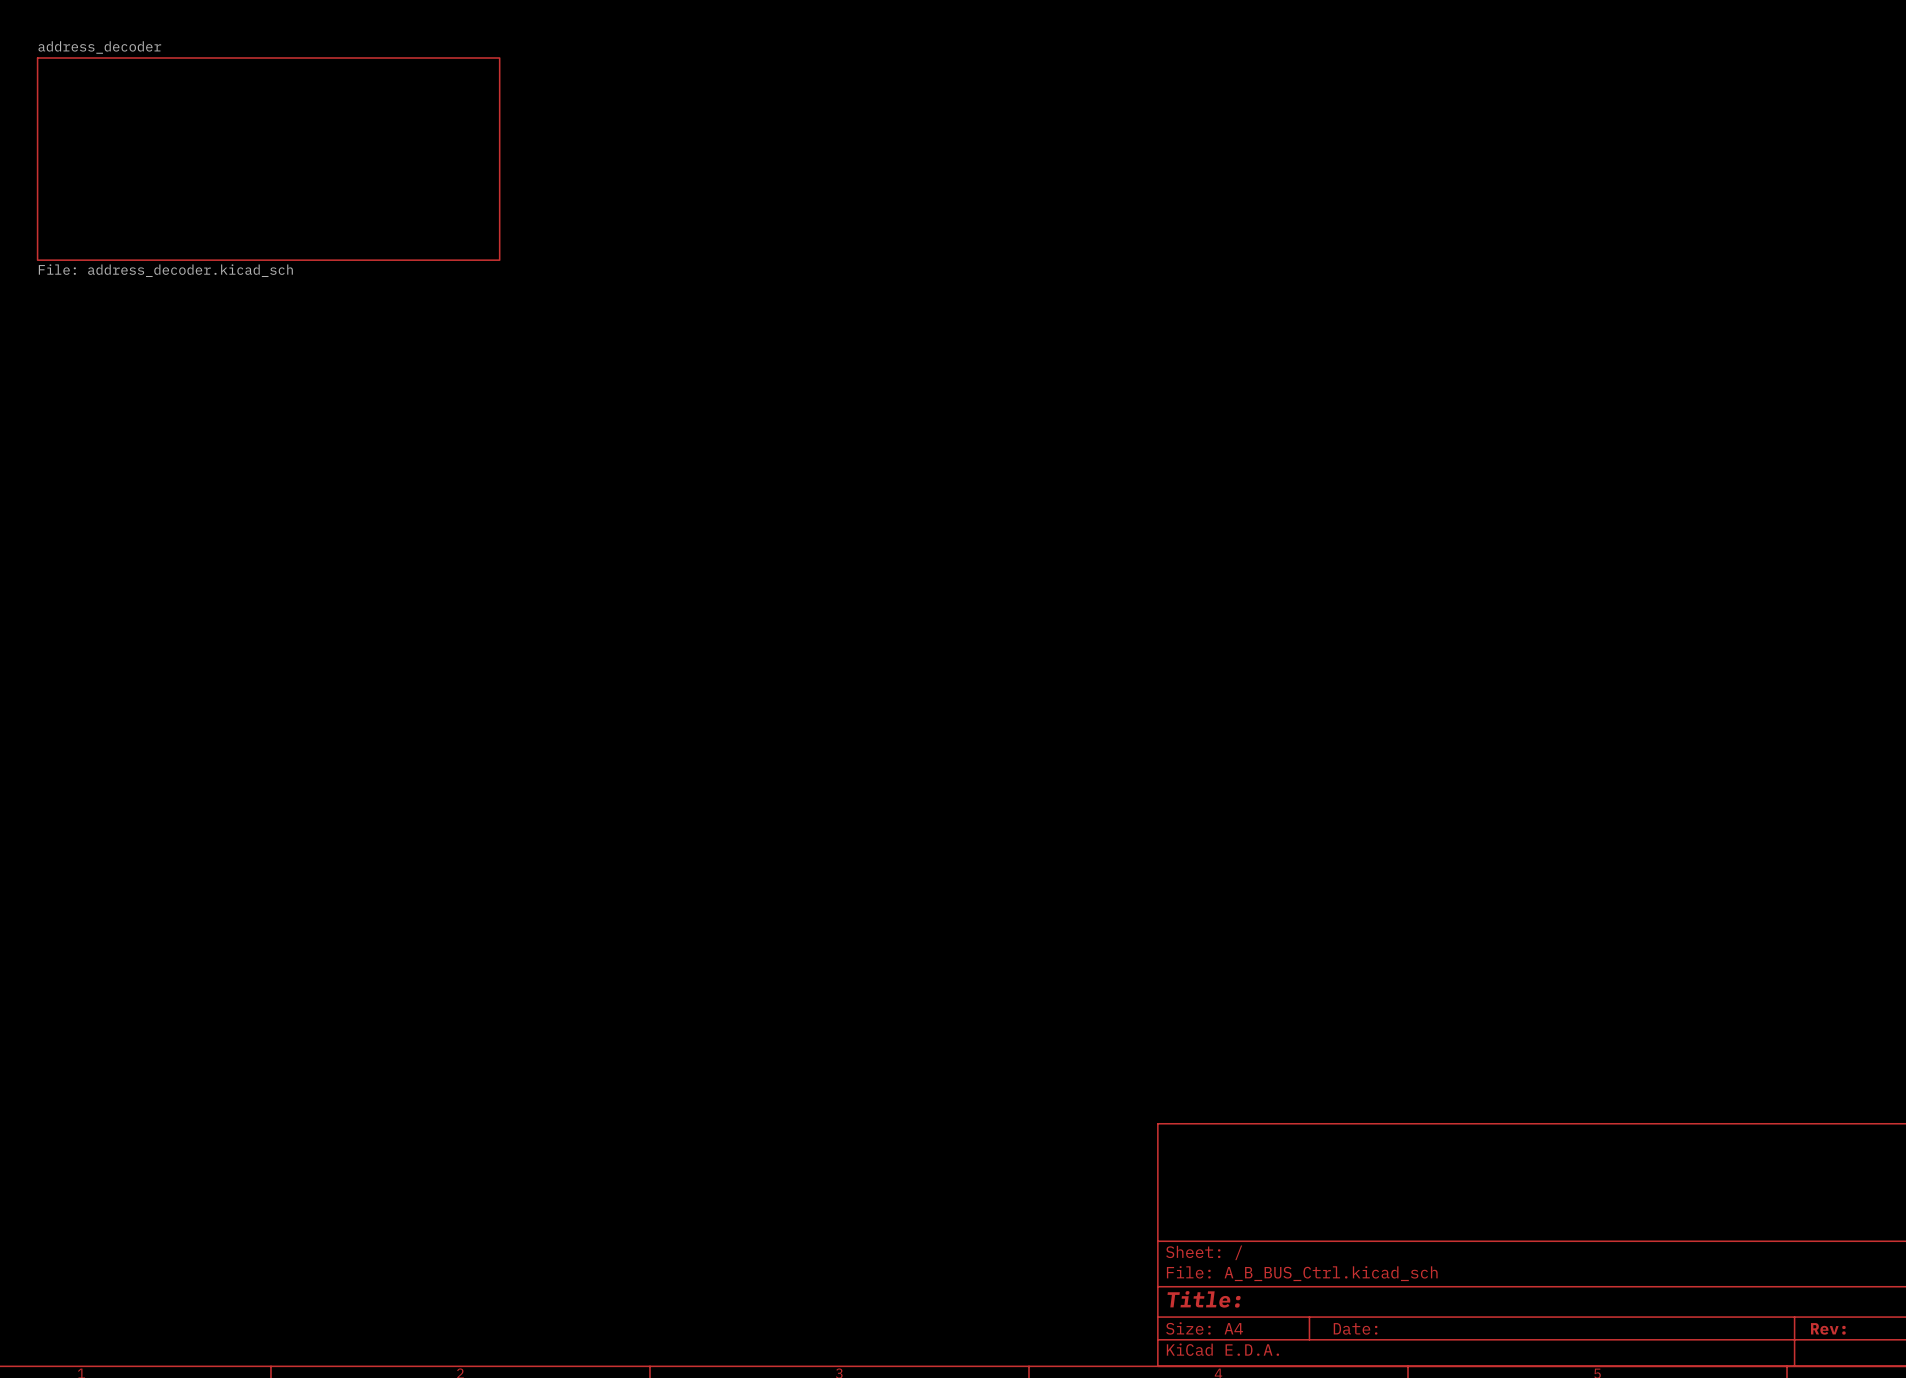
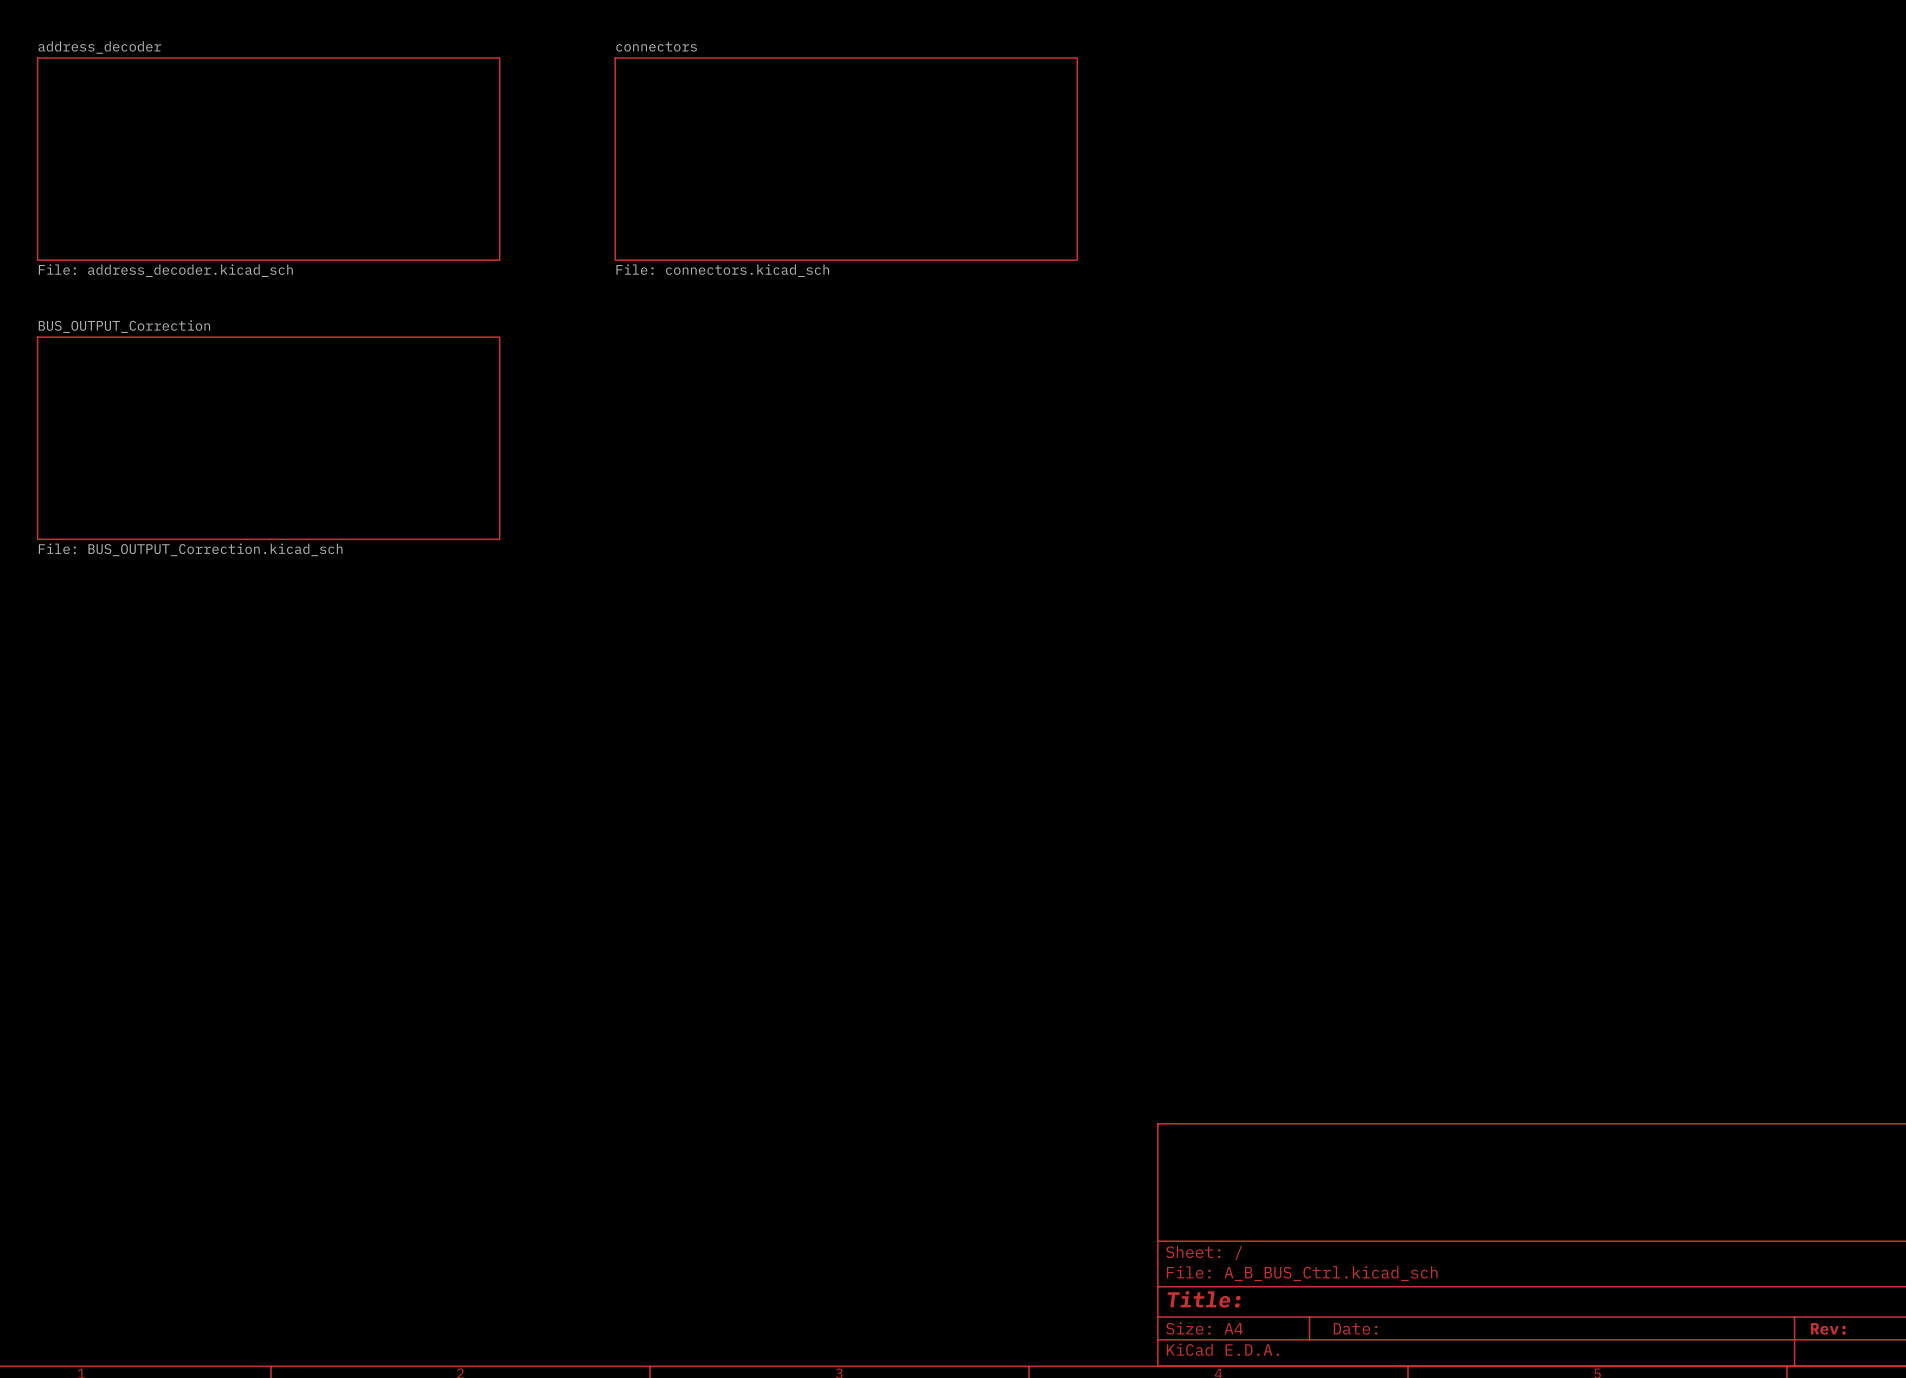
sheet connectors: none -> File: connectors.kicad_sch (846, 159)
sheet BUS_OUTPUT_Correction: none -> File: BUS_OUTPUT_Correction.kicad_sch (268, 438)

